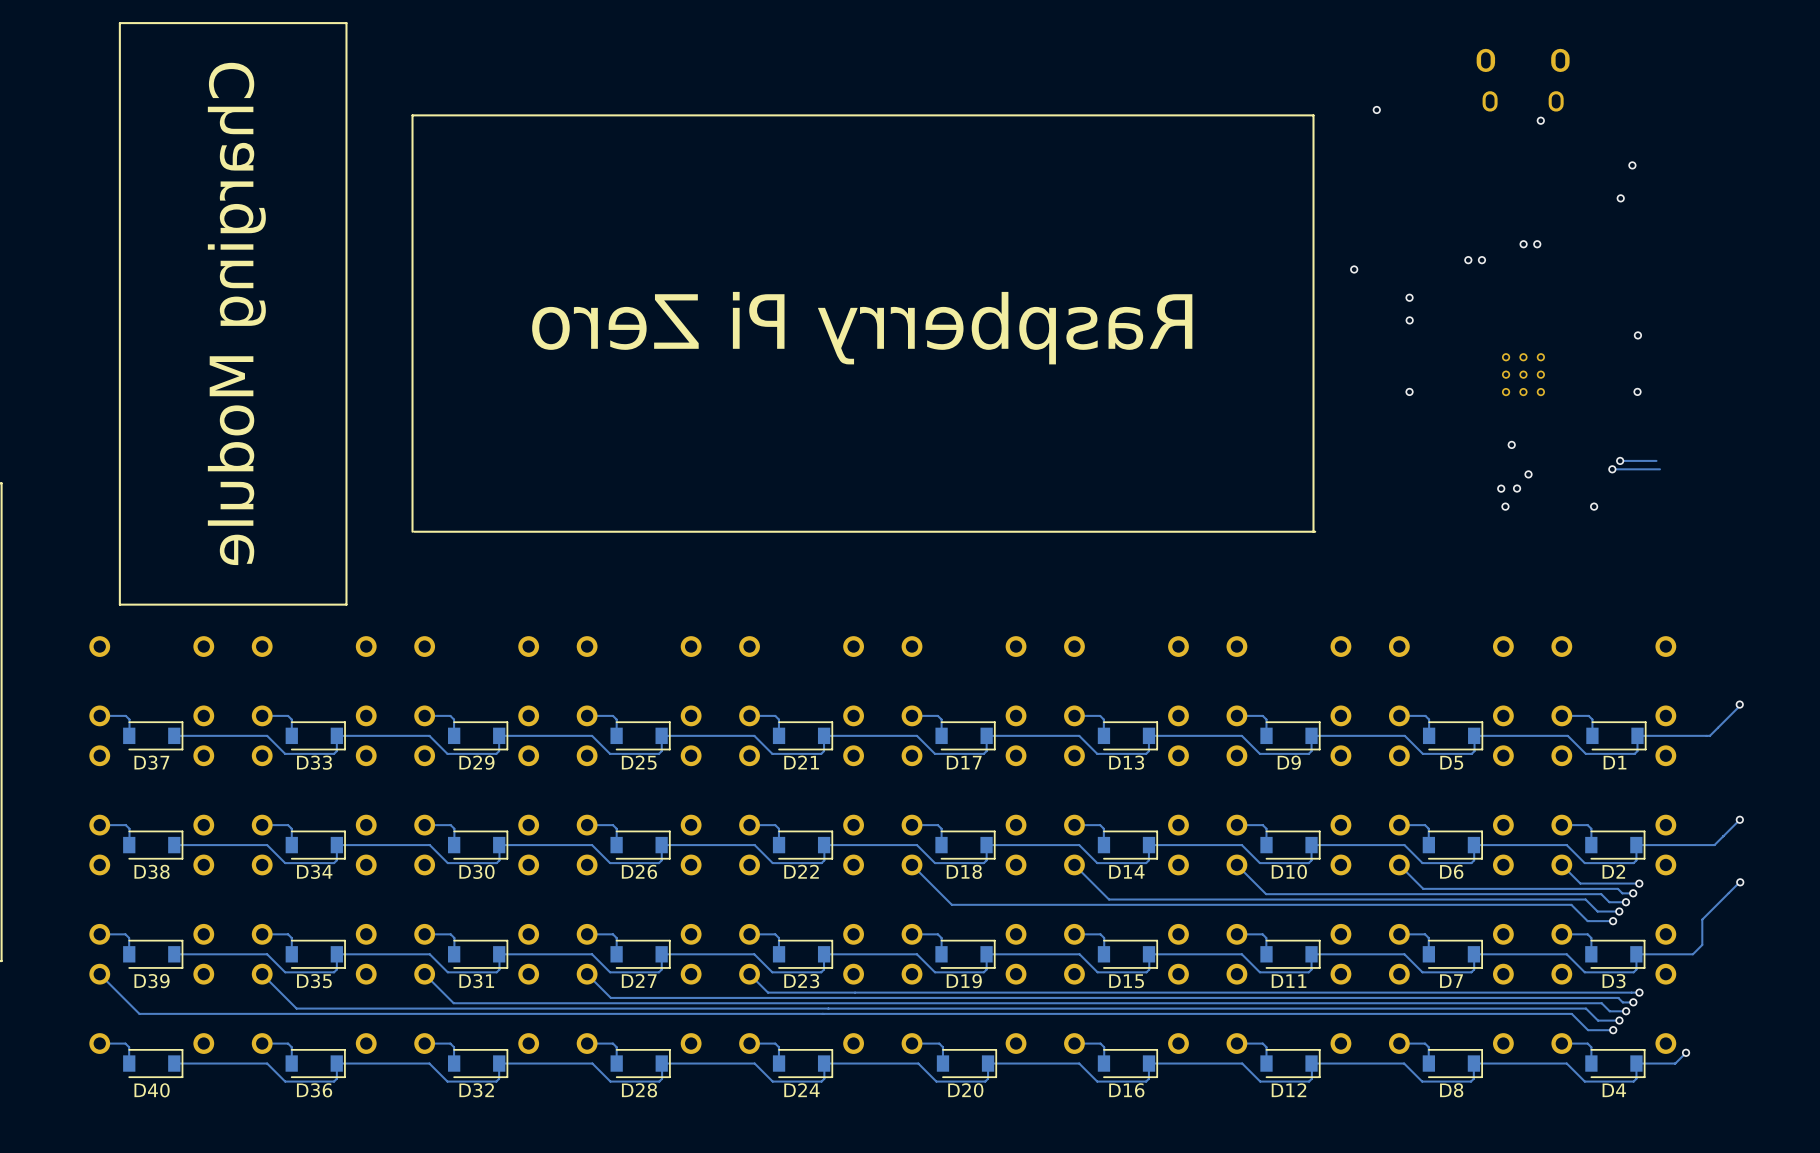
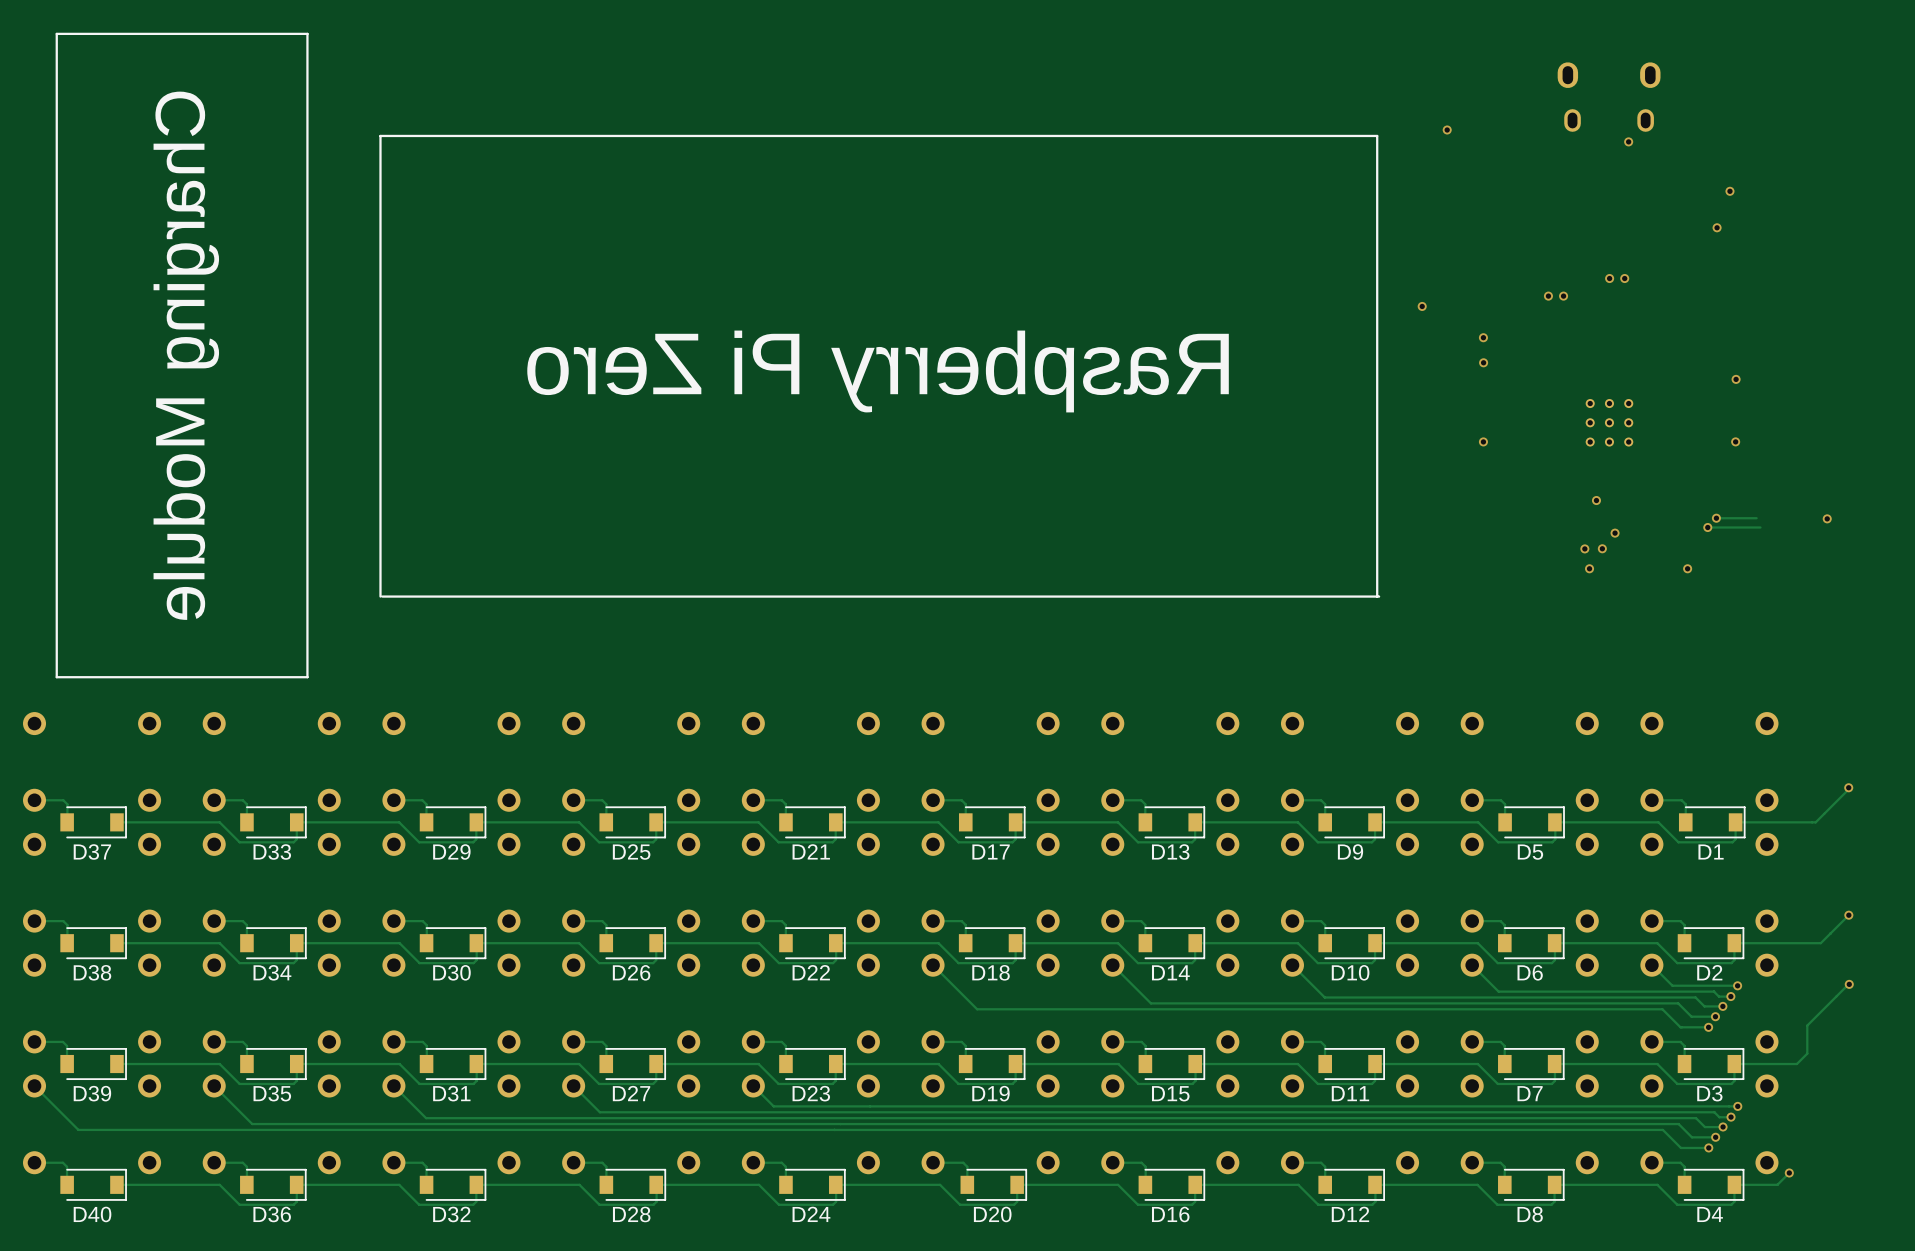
via: none -> (1827, 518)

